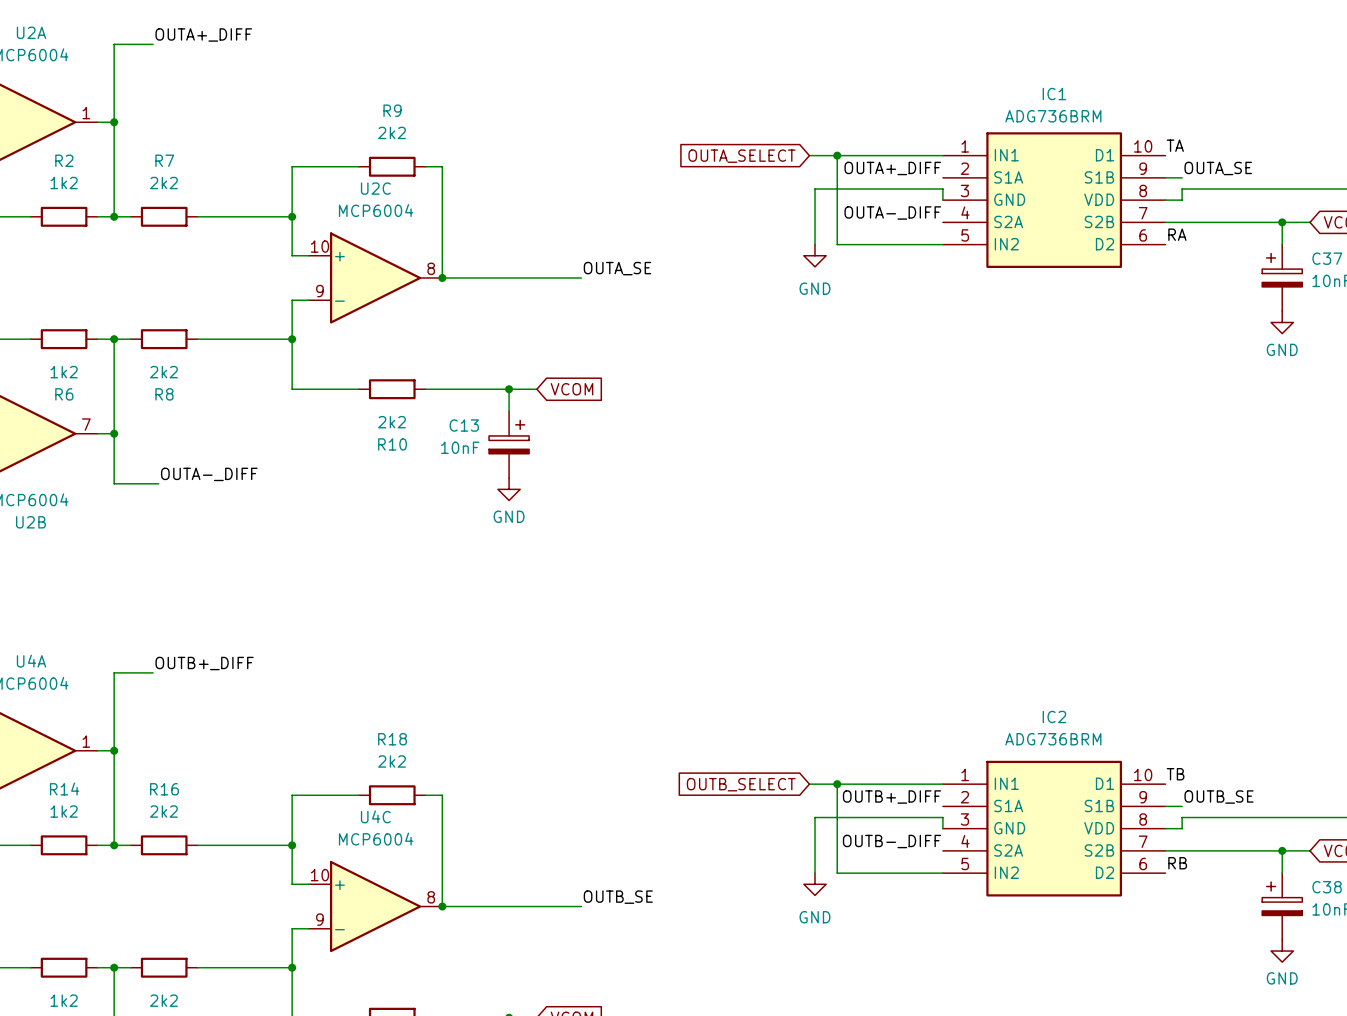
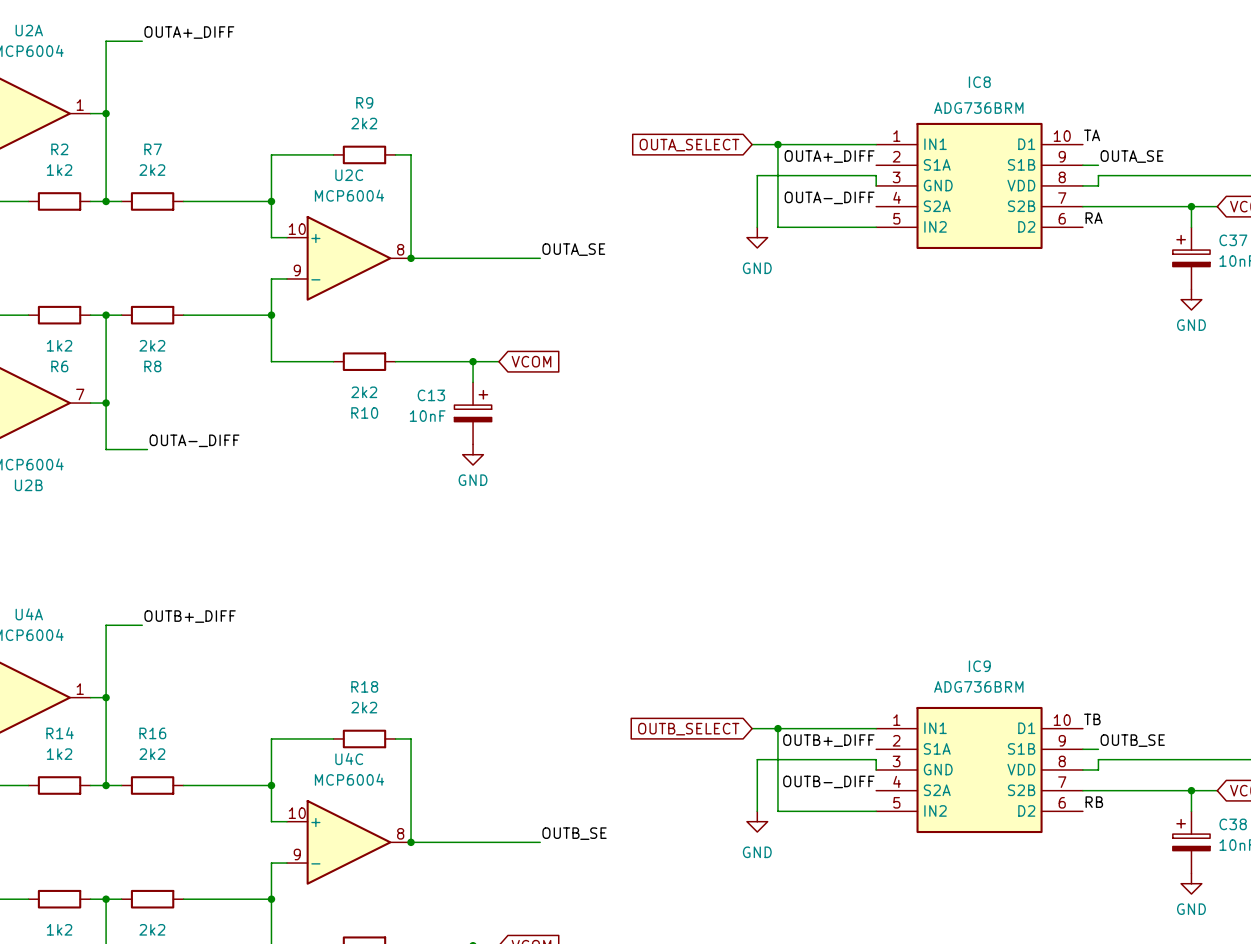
IC1 name: IC1 (1054, 94) -> IC8 (979, 82)
IC2 name: IC2 (1054, 716) -> IC9 (979, 666)

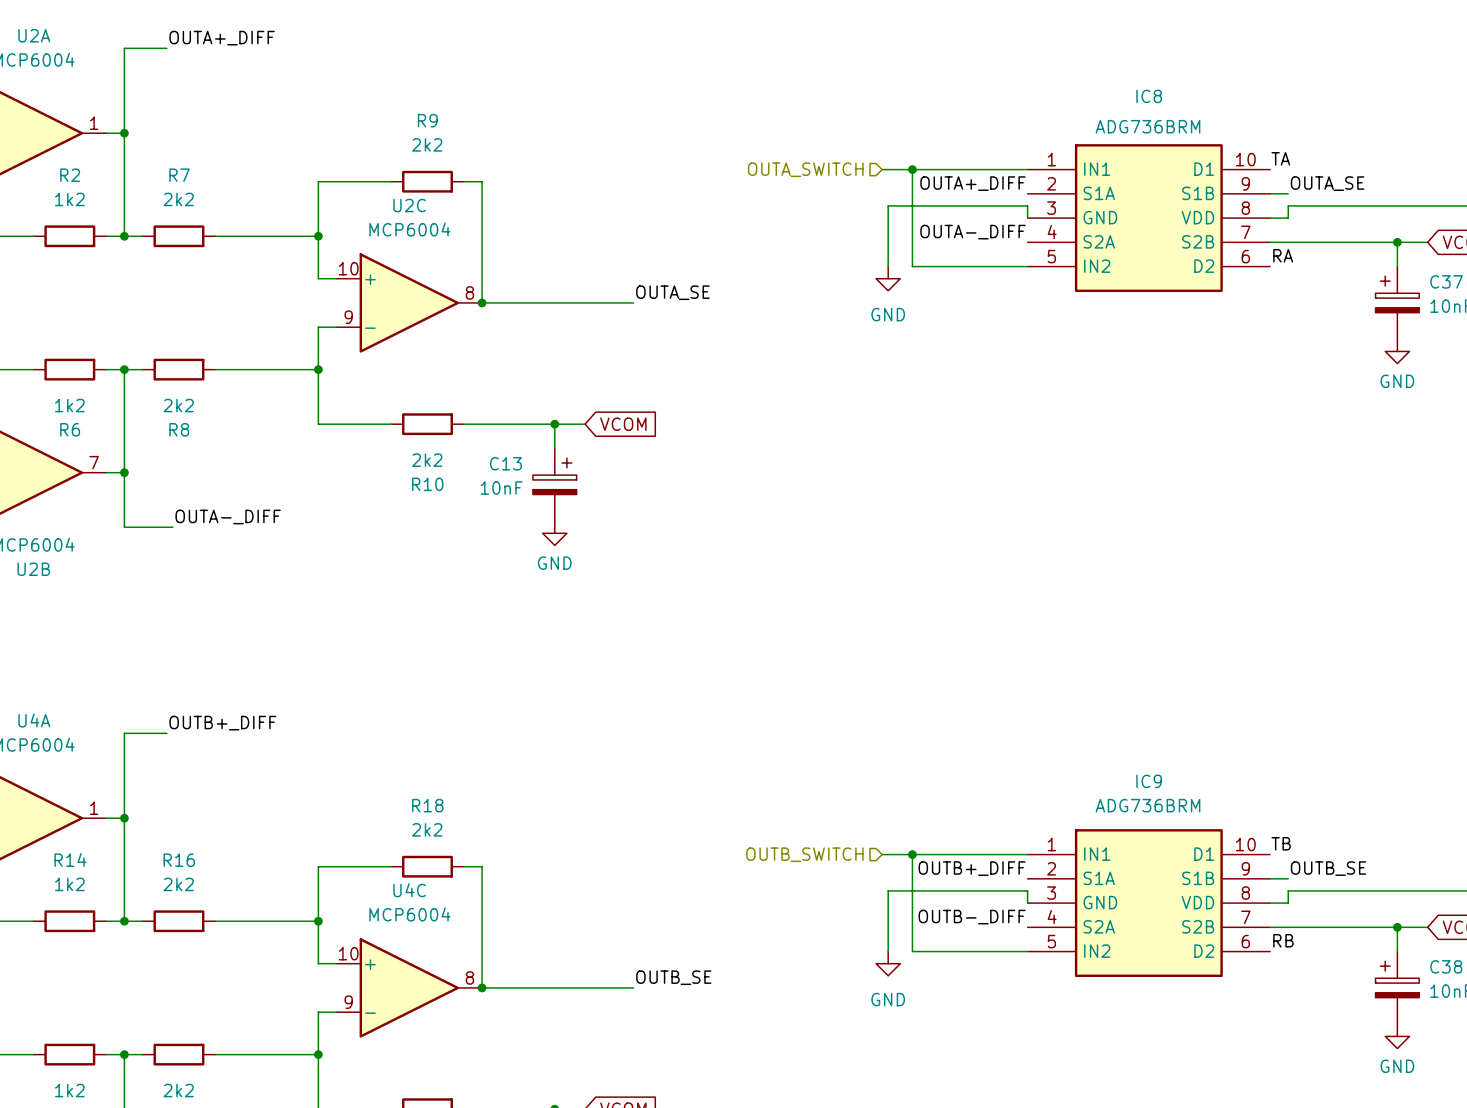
hierarchical label: none -> OUTA_SWITCH (805, 169)
global label: OUTA_SELECT (689, 145) -> none
hierarchical label: none -> OUTB_SWITCH (804, 854)
global label: OUTB_SELECT (688, 729) -> none

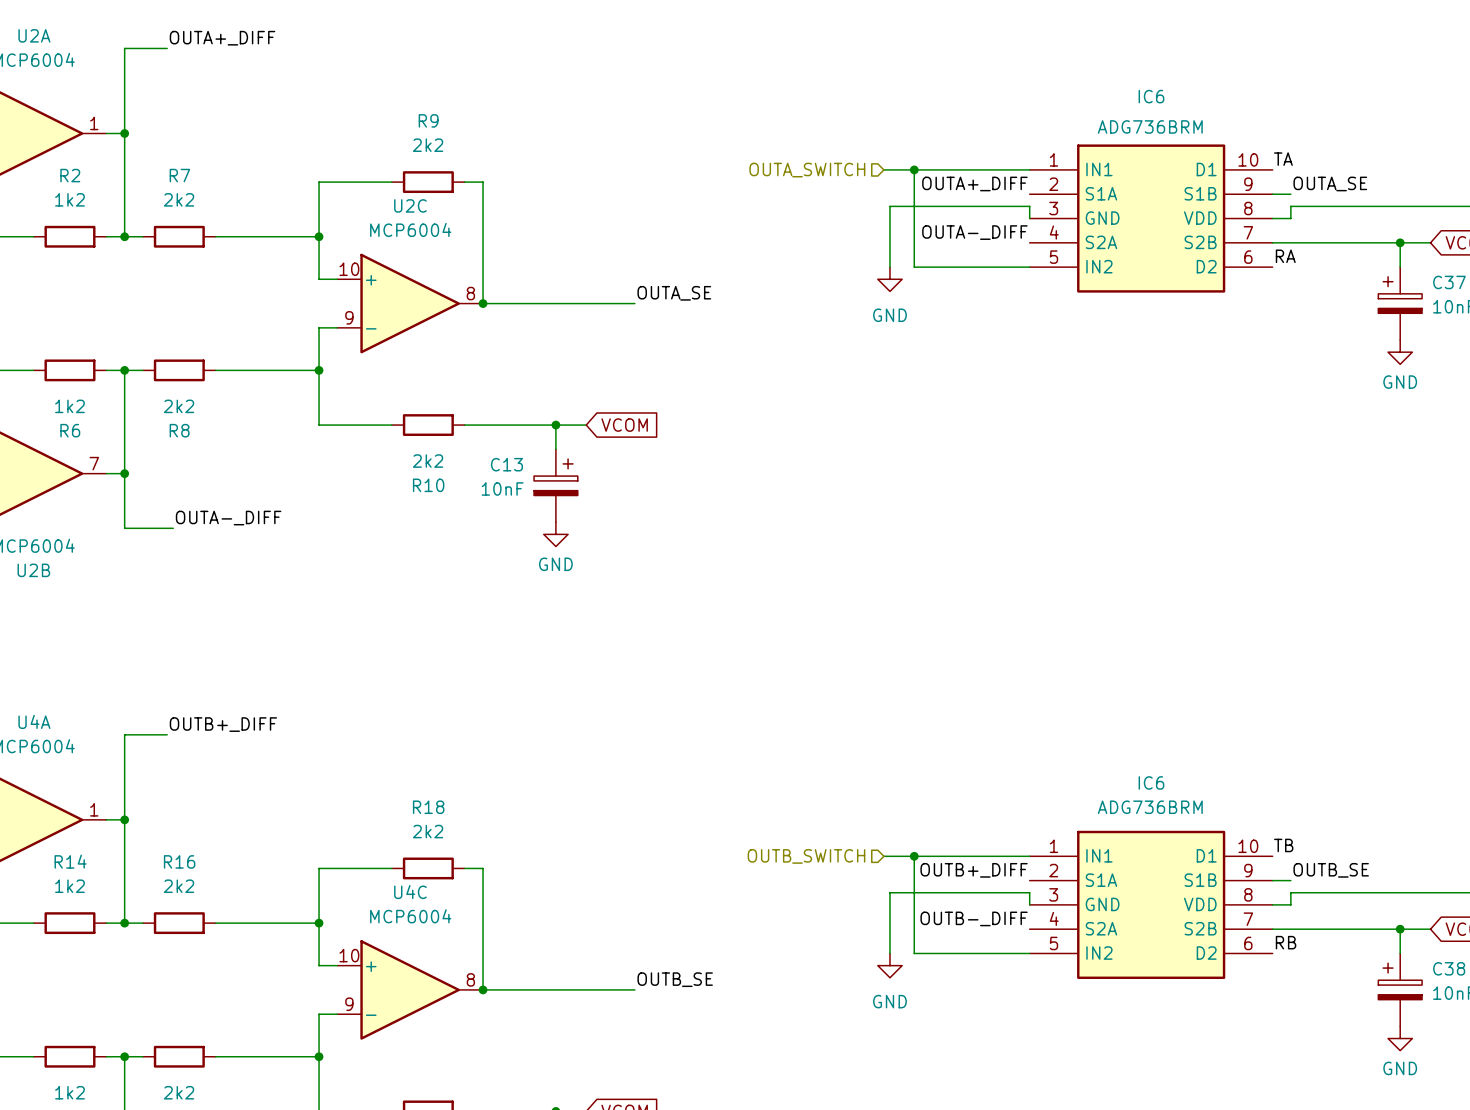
IC8 name: IC8 (1149, 96) -> IC6 (1151, 96)
IC9 name: IC9 (1149, 781) -> IC6 (1151, 782)

